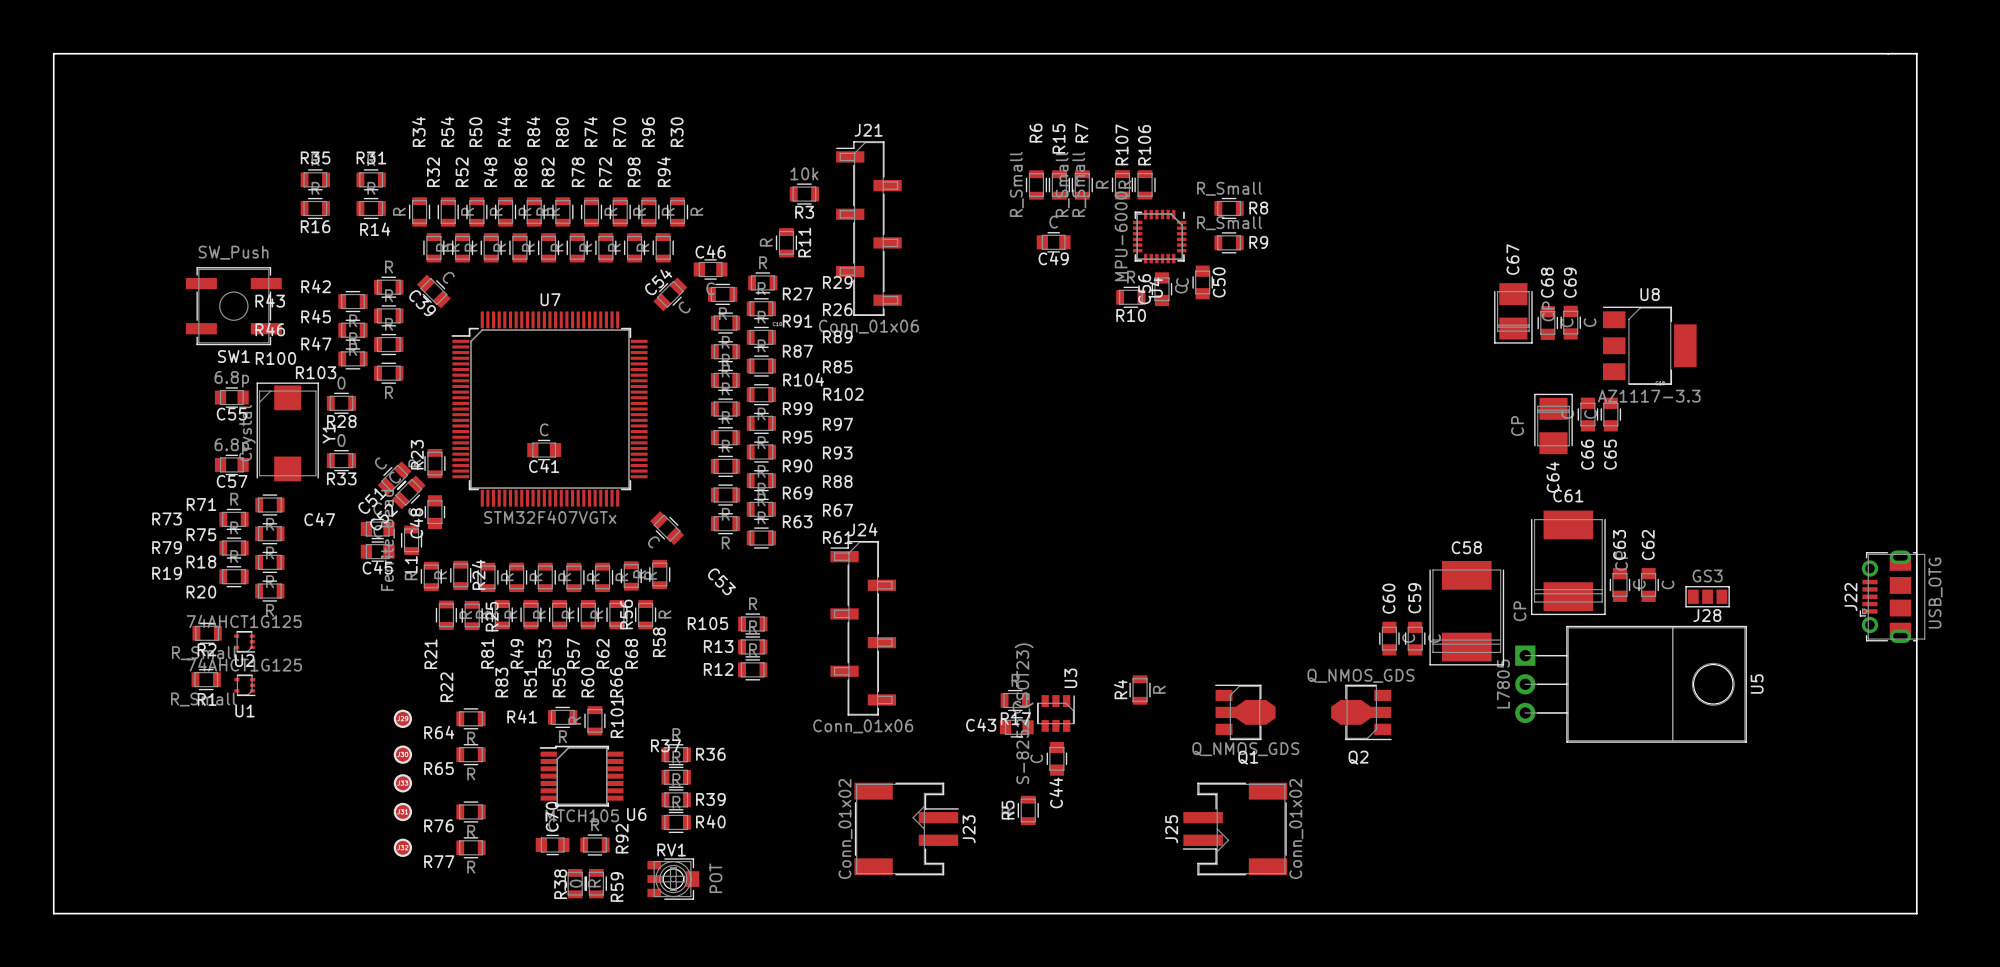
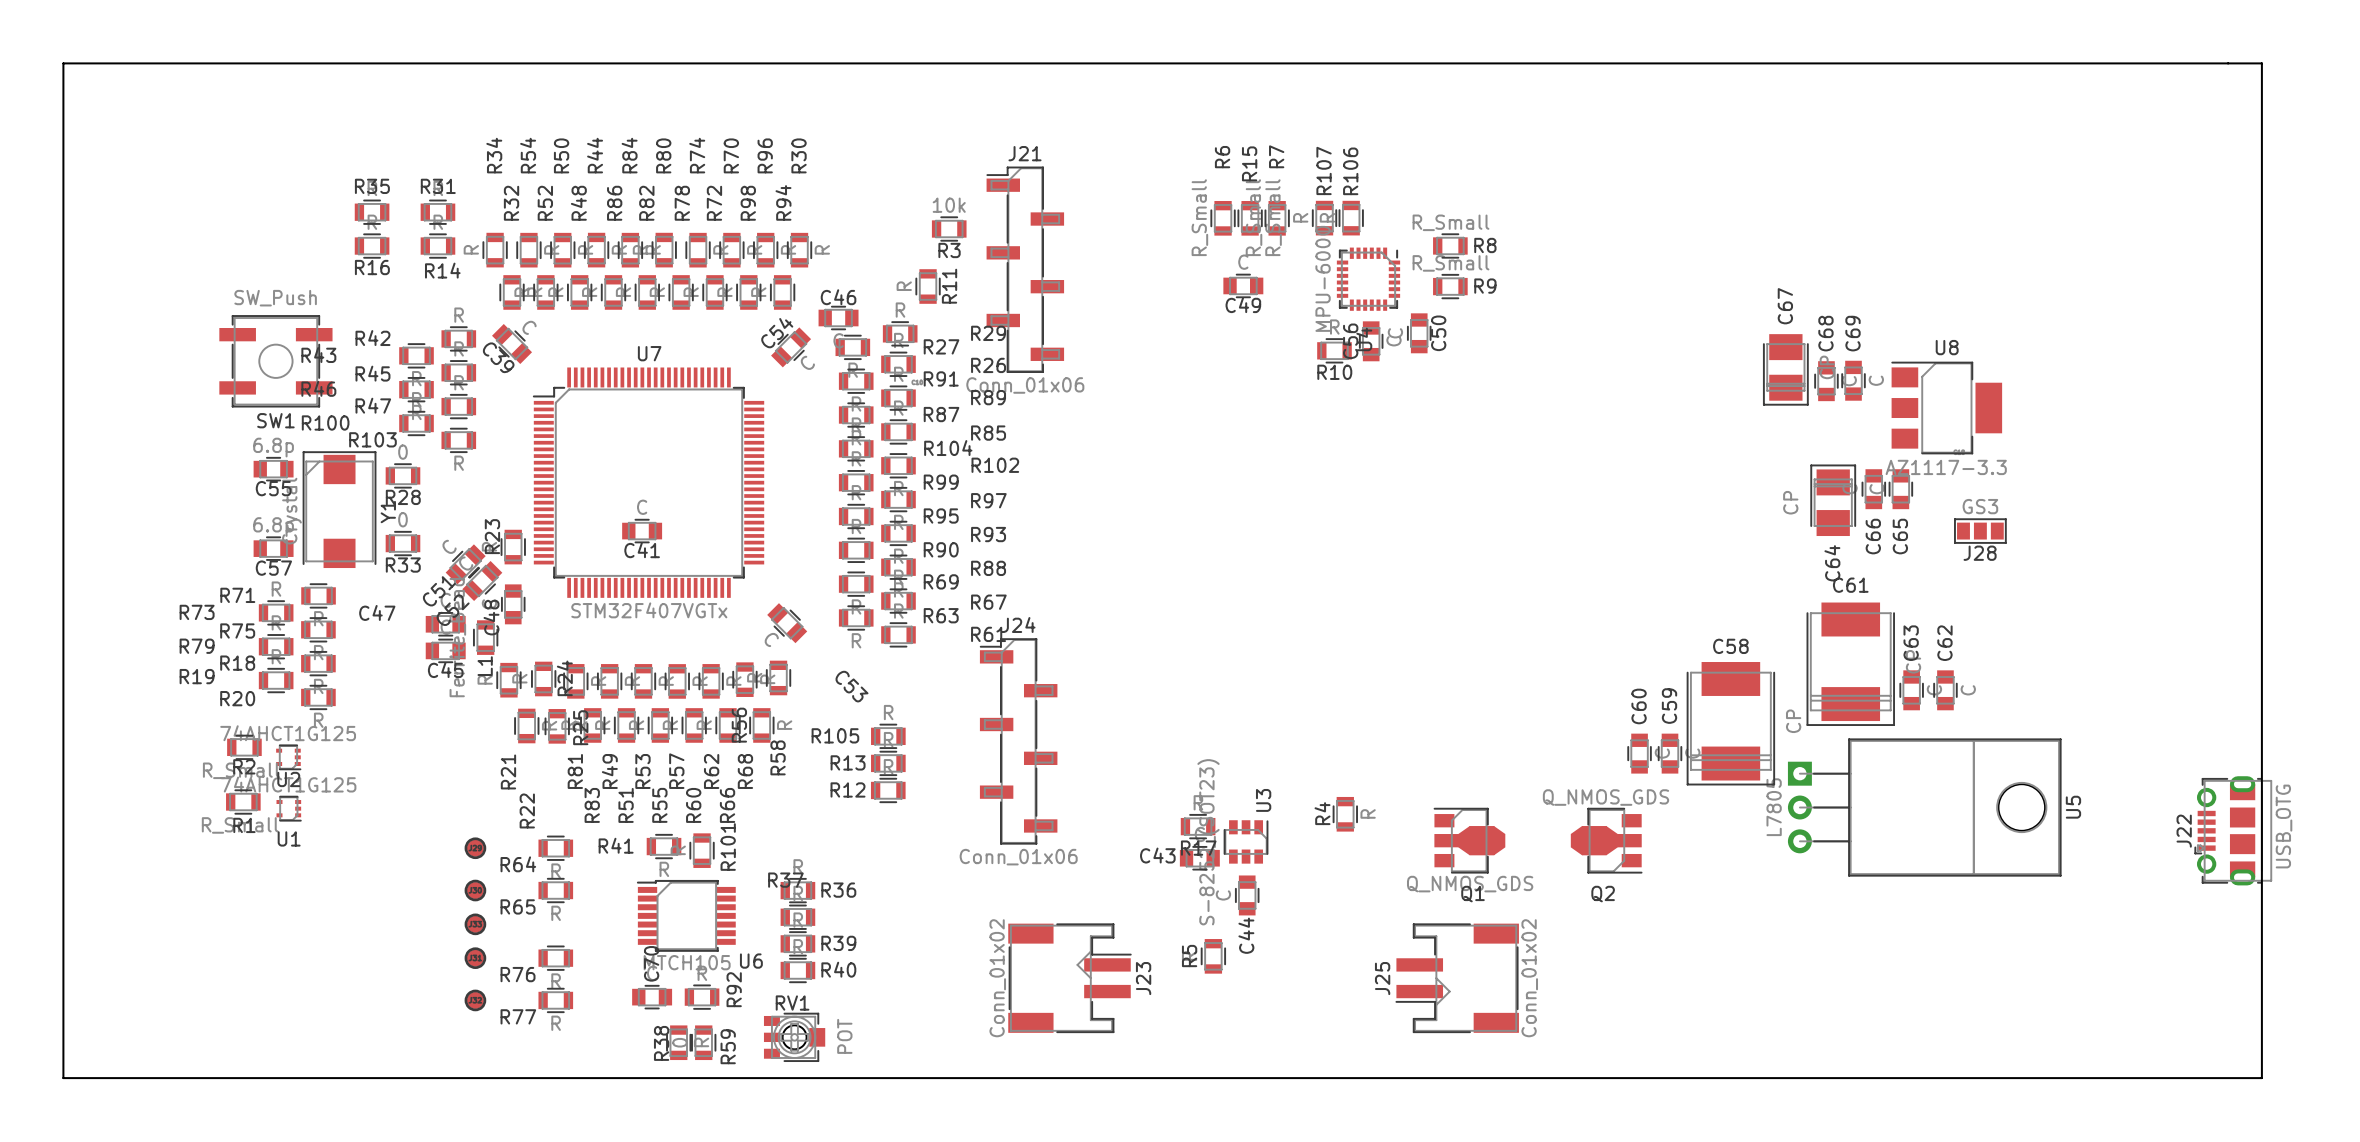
J28 position: (1707, 596) -> (1980, 531)
J22 position: (1892, 596) -> (2233, 830)

